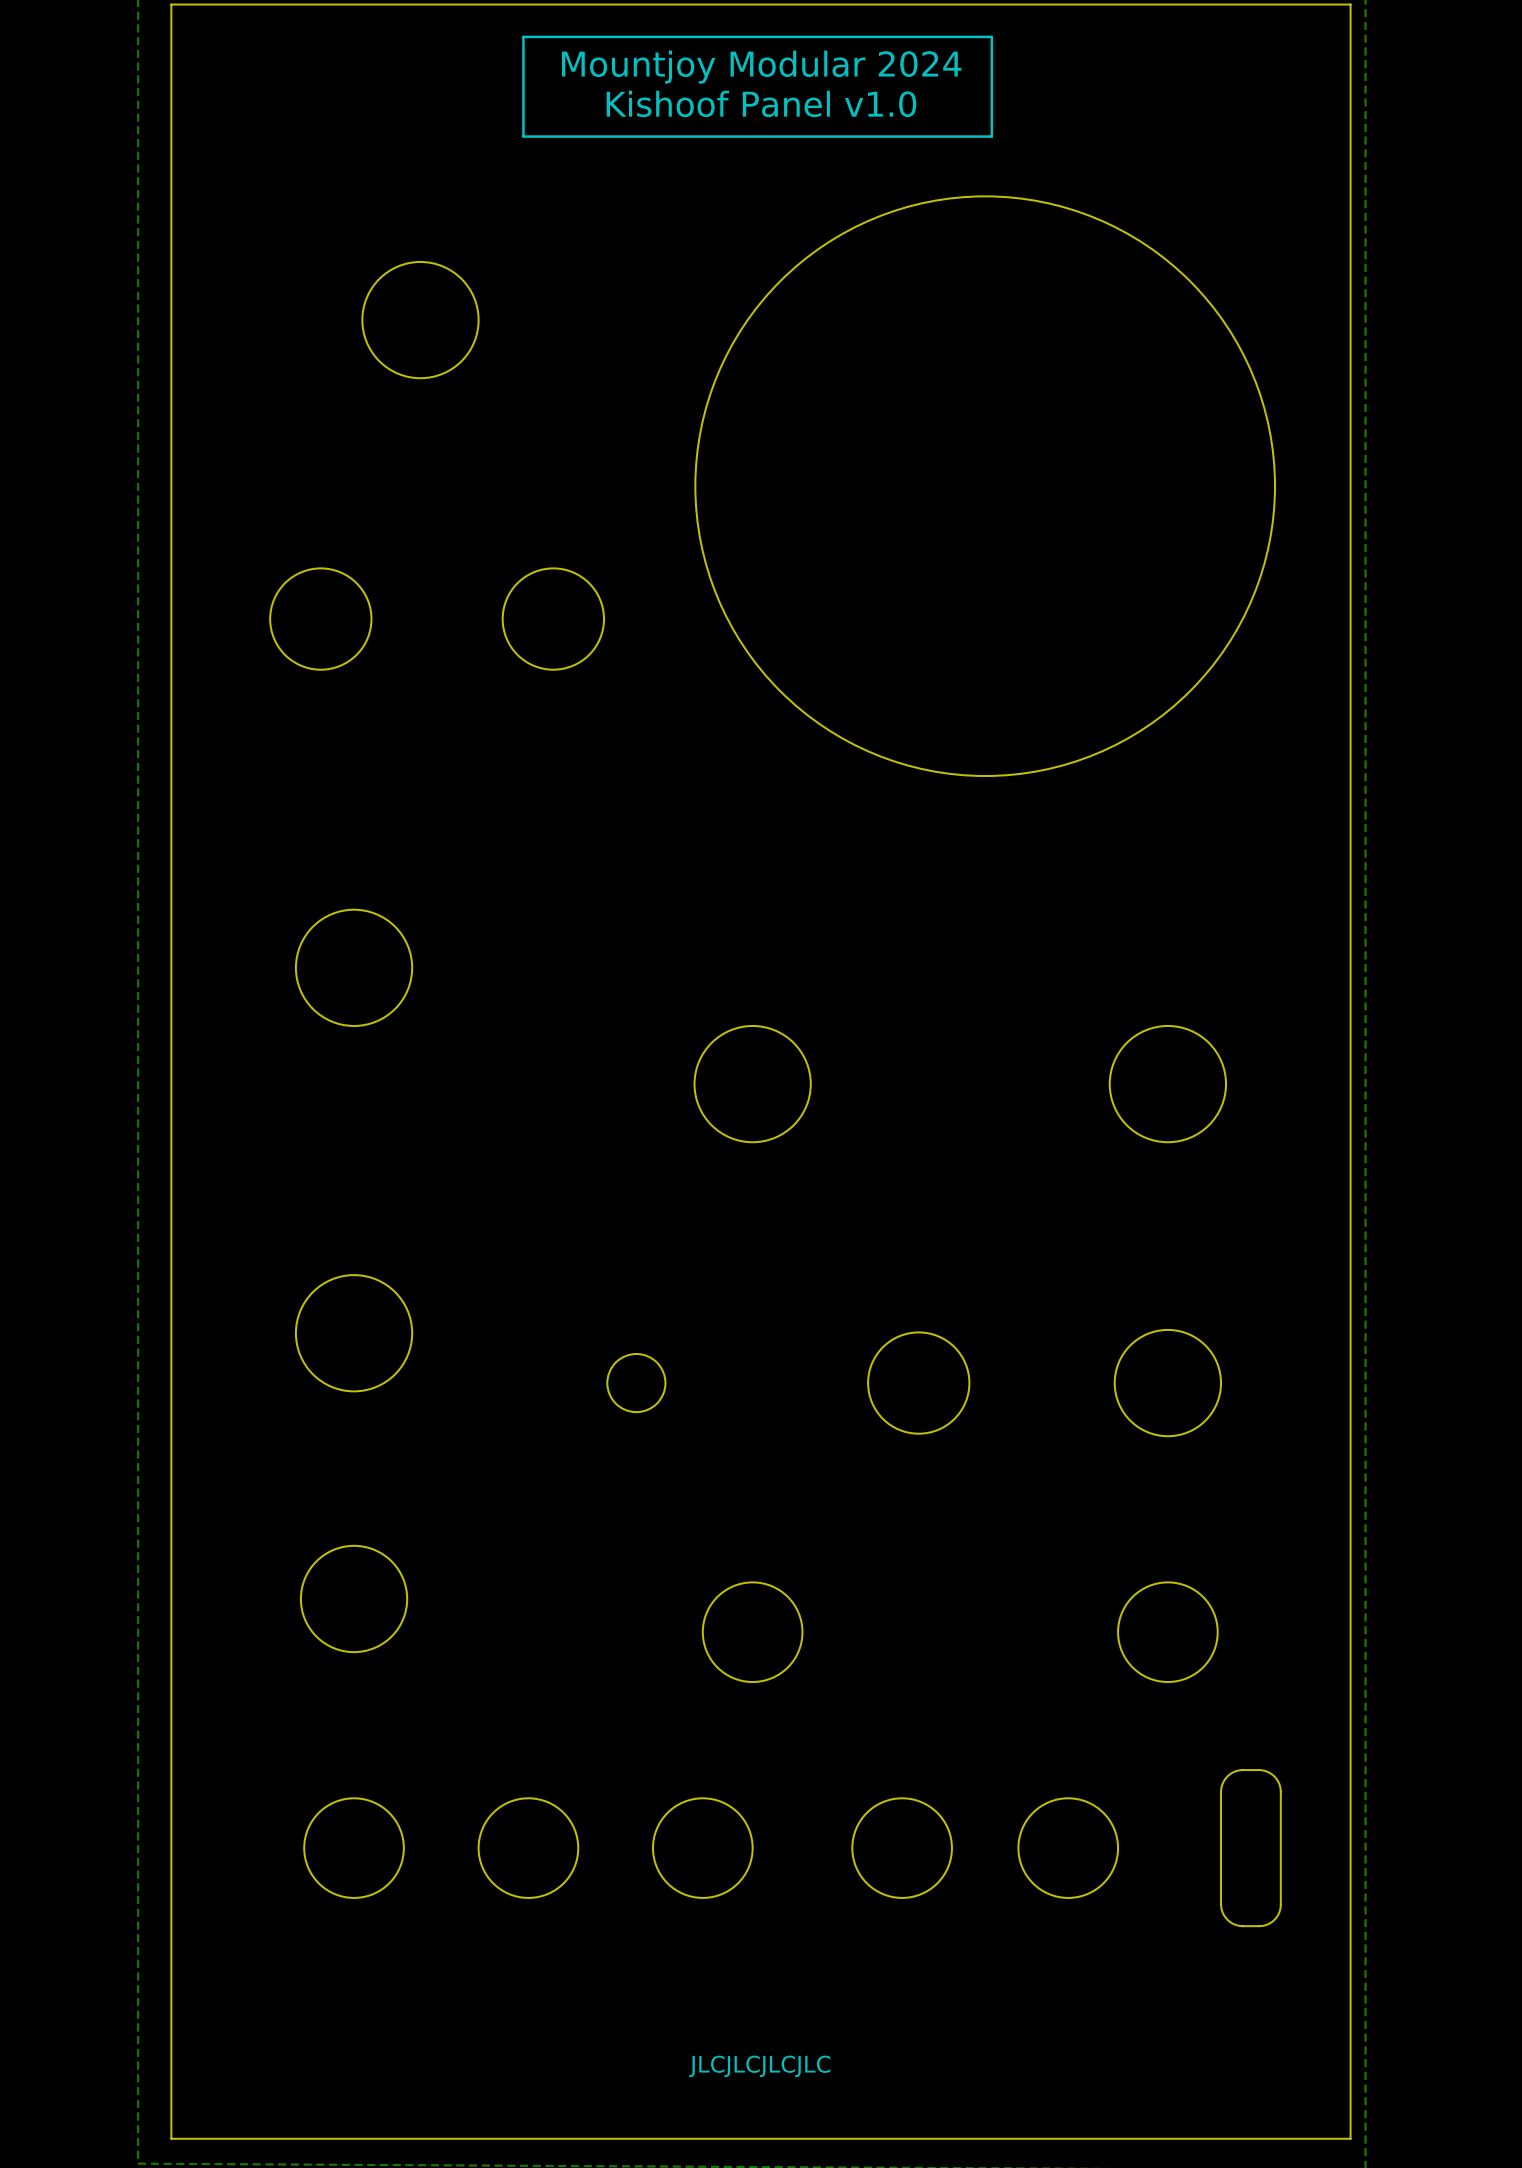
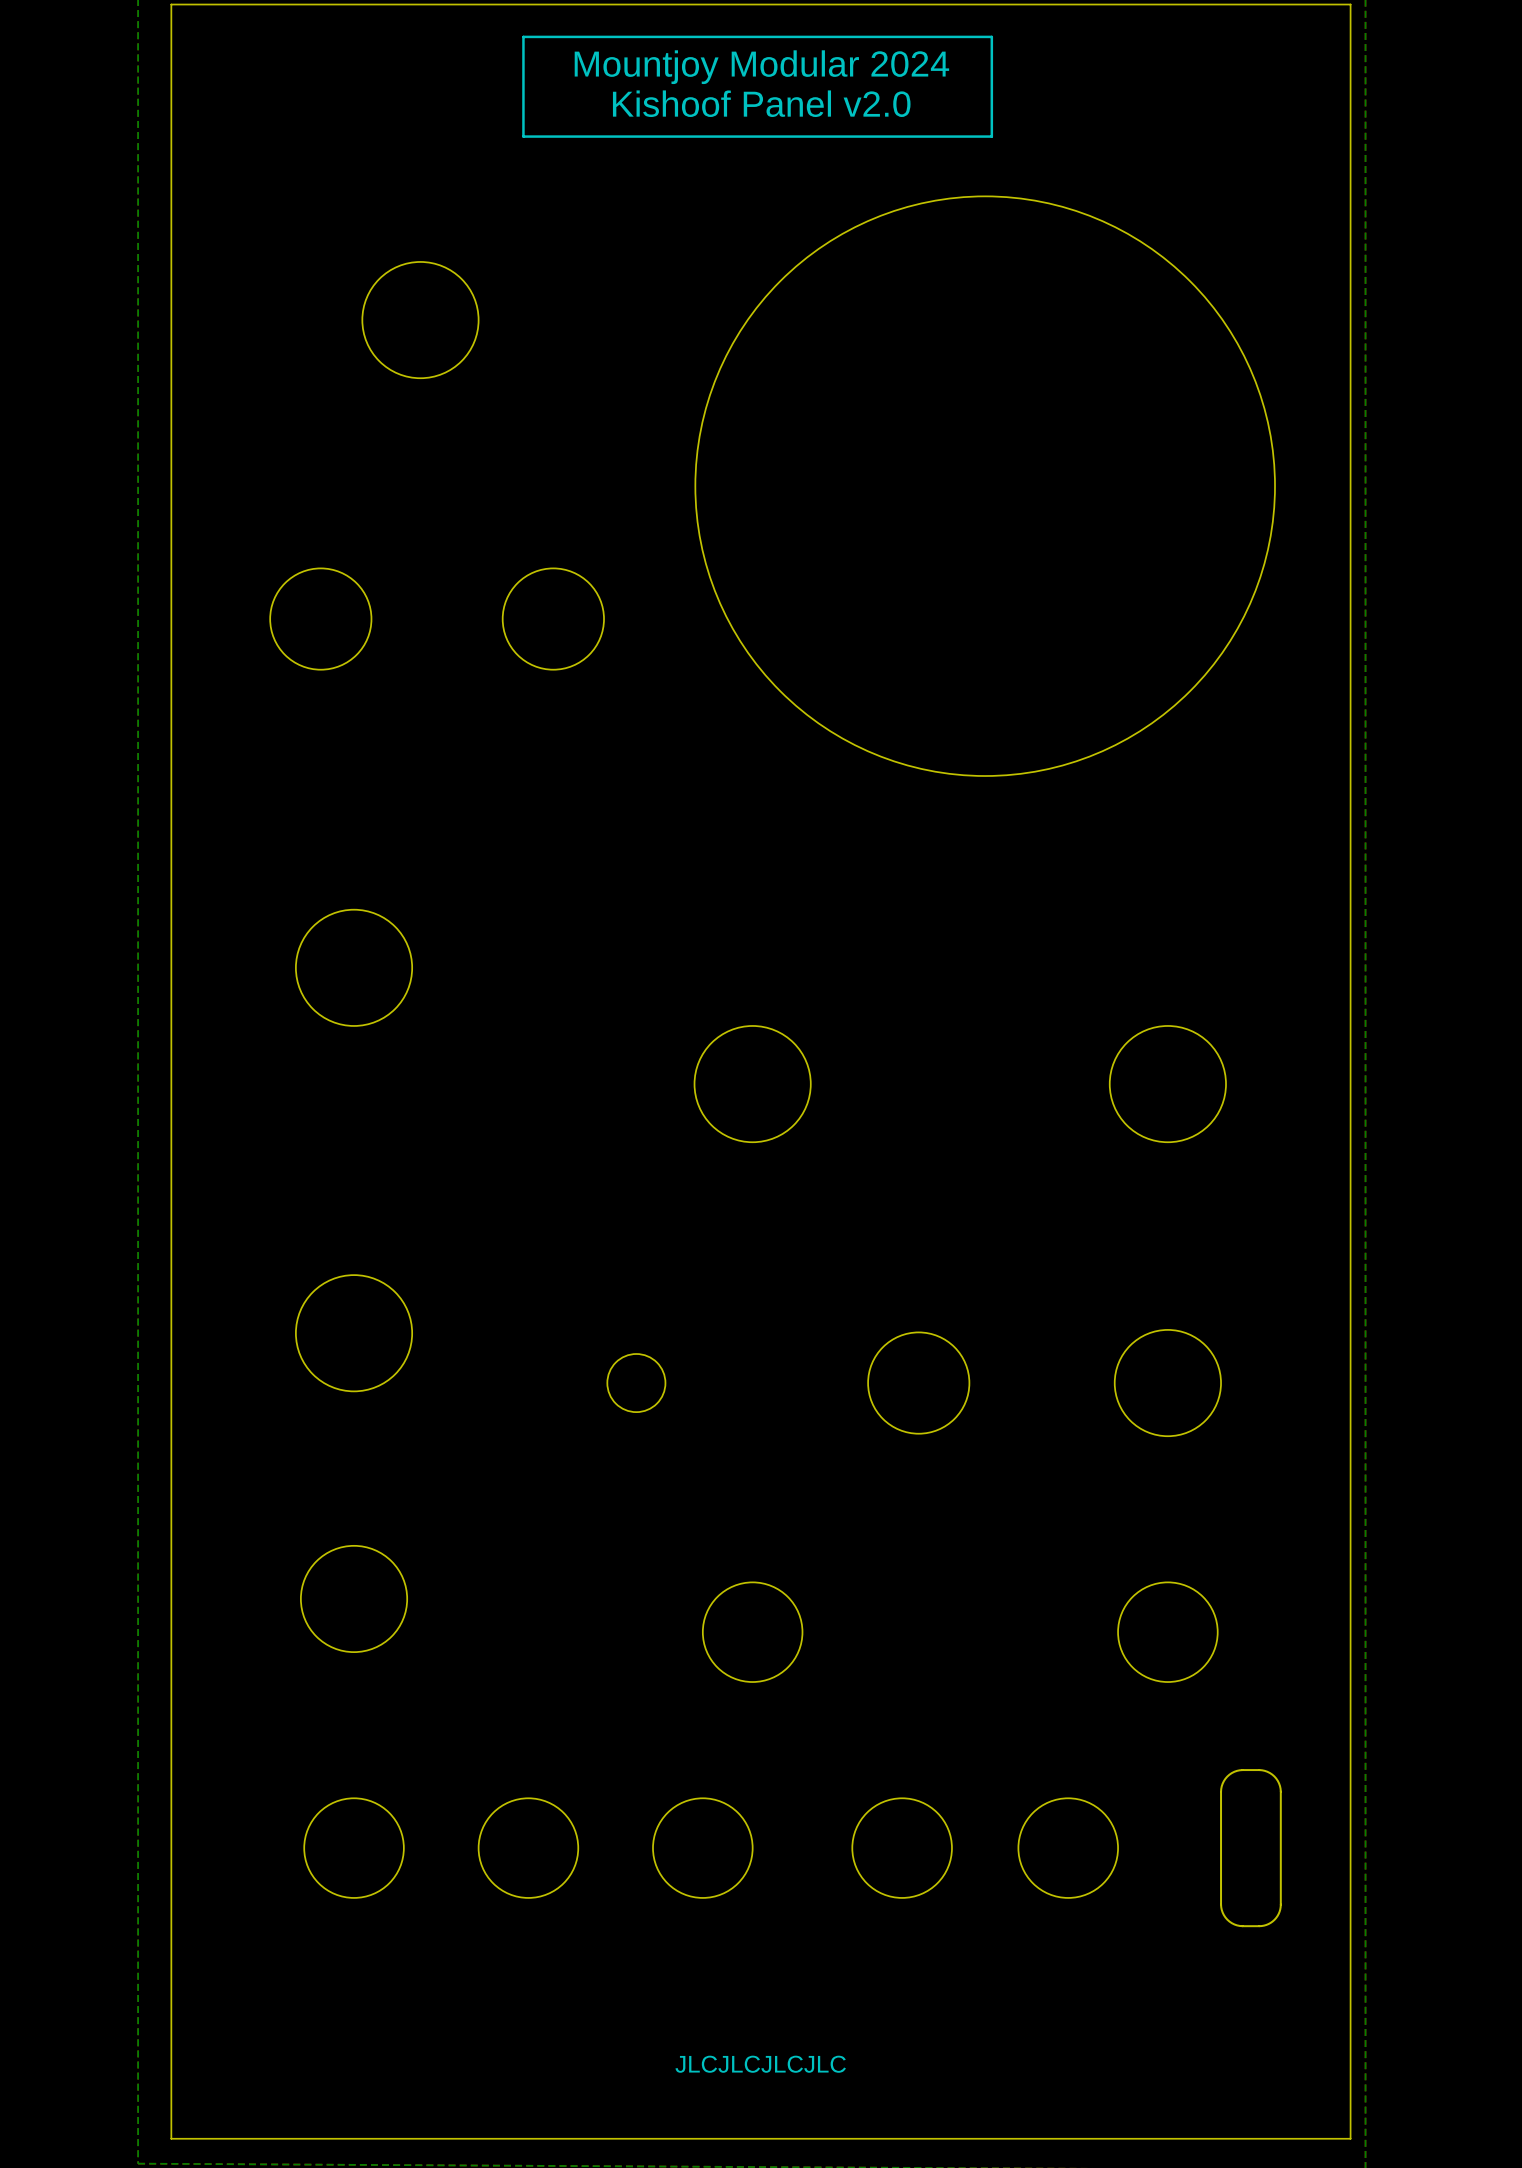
text: Kishoof Panel v1.0 (761, 103) -> Kishoof Panel v2.0 (761, 103)

